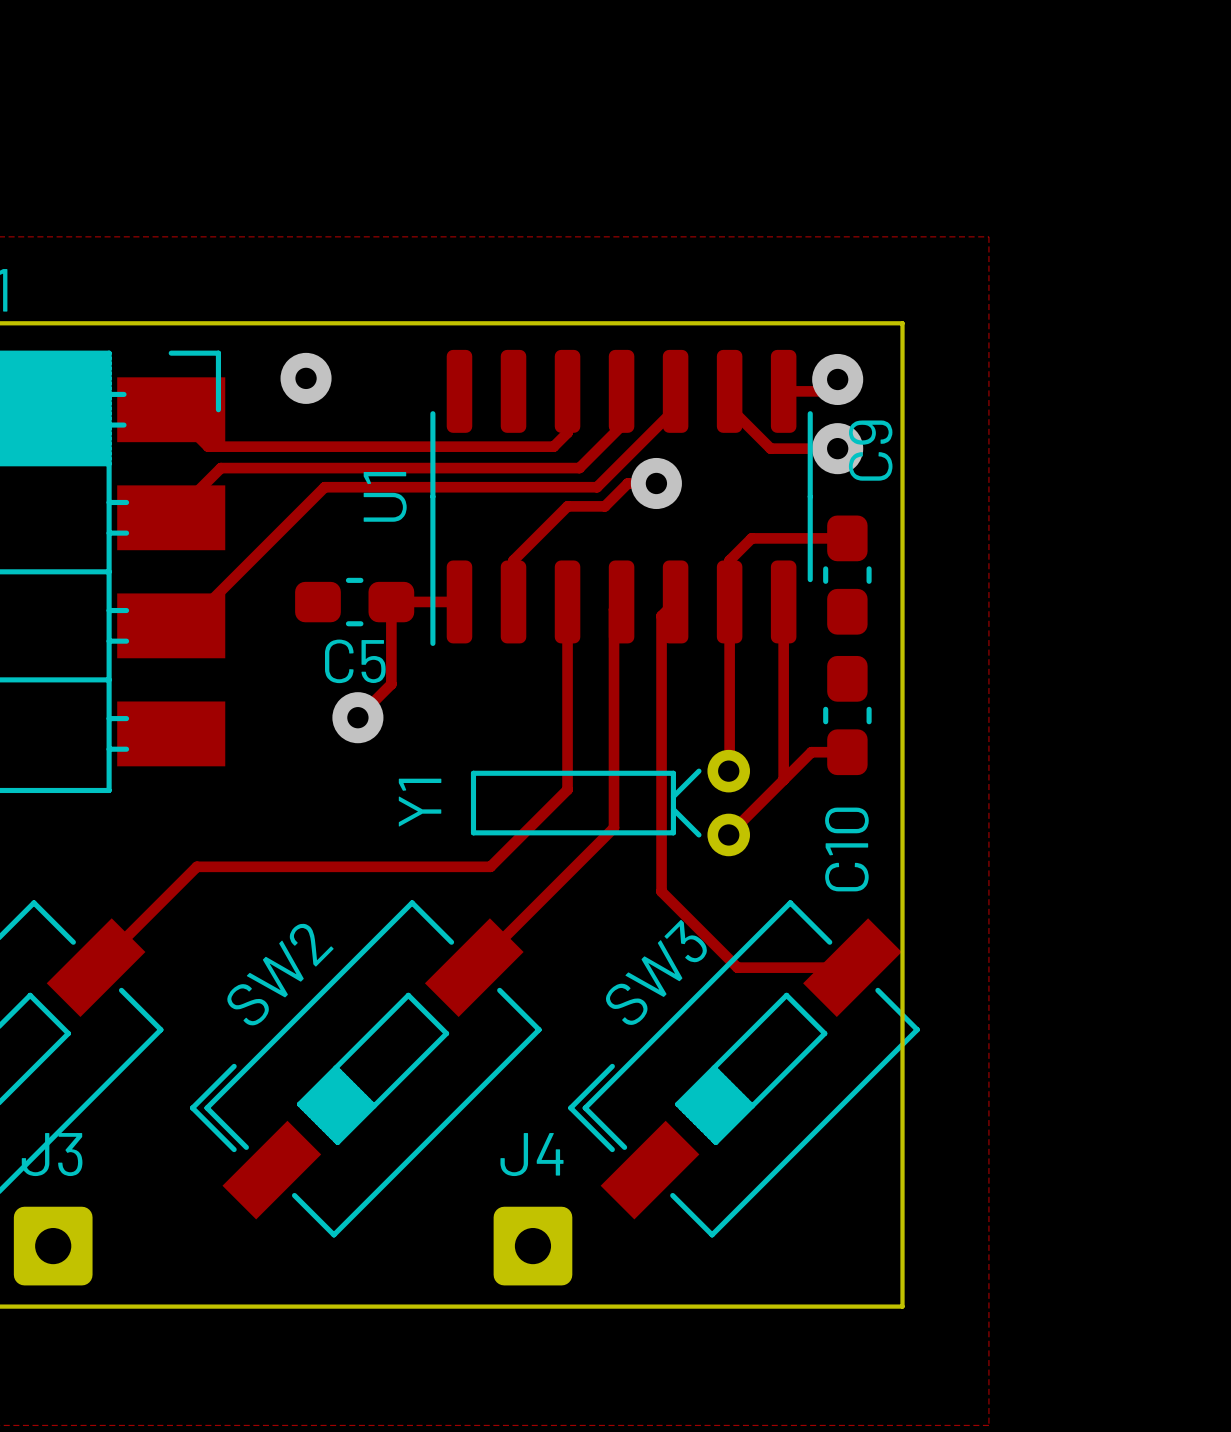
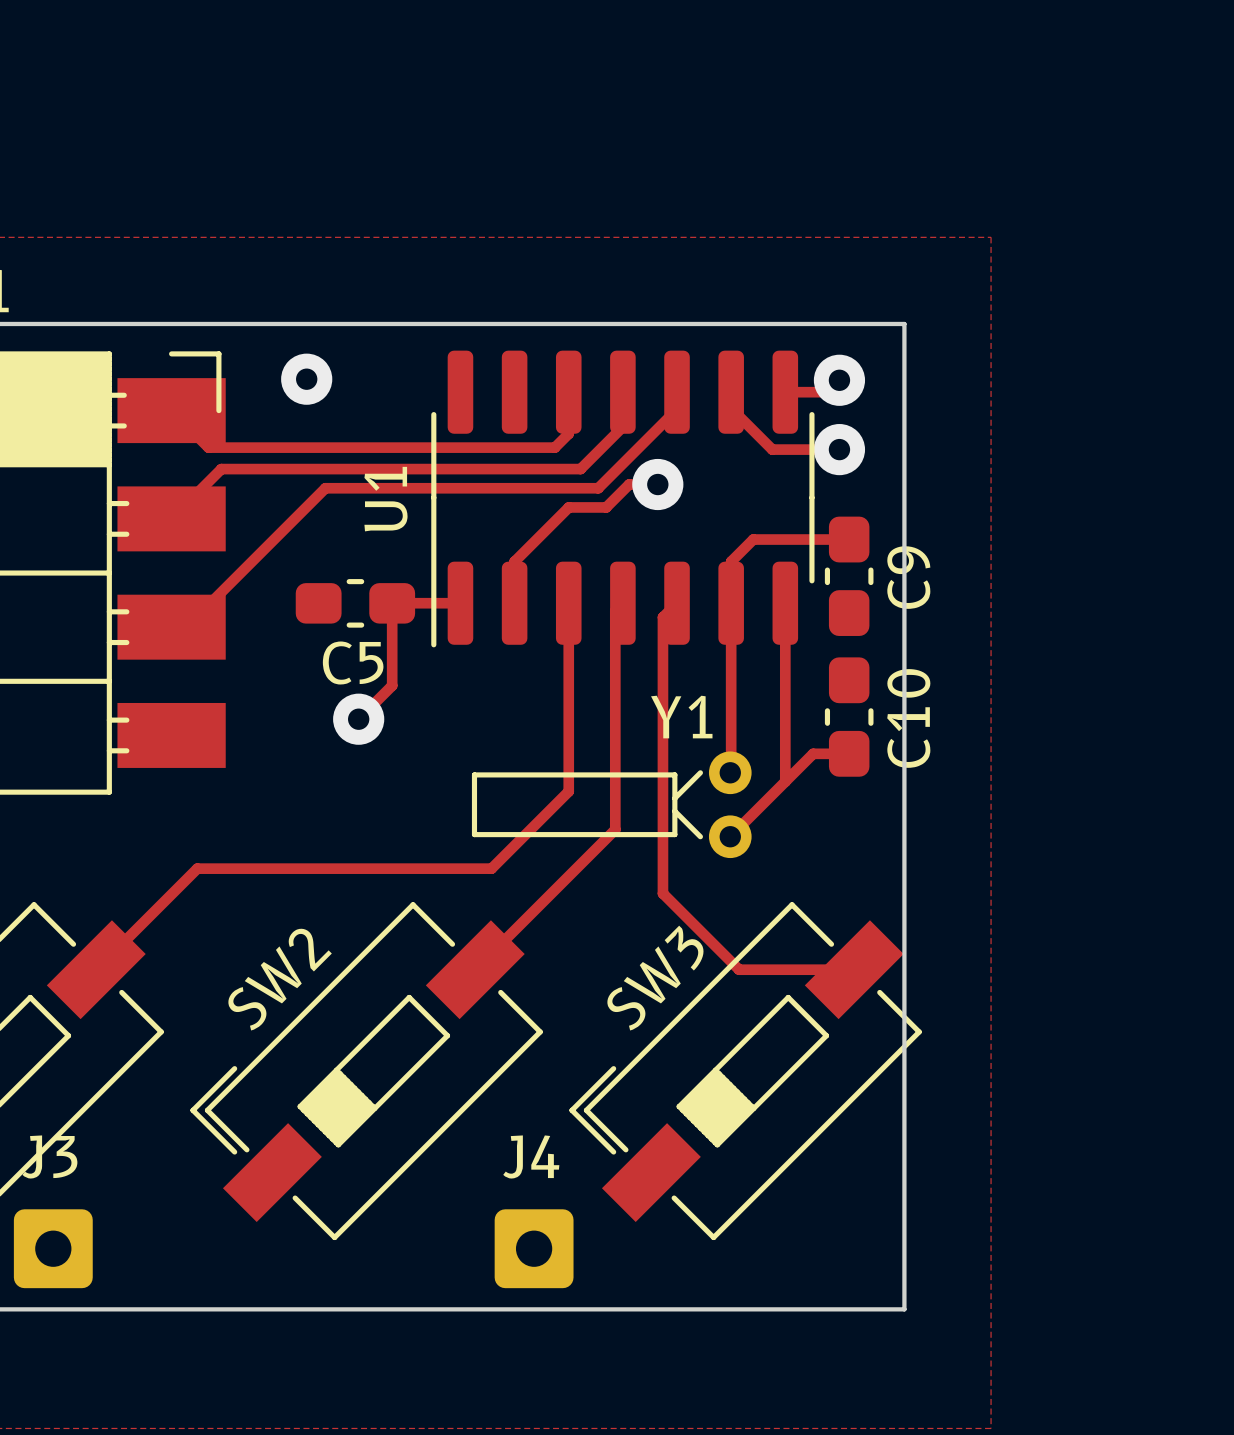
C9 name position: C9 (870, 450) -> C9 (908, 577)
Y1 name rotation: 0° (420, 802) -> 90° clockwise (681, 717)
Y1 name position: Y1 (420, 802) -> Y1 (681, 717)
C10 name position: C10 (846, 849) -> C10 (908, 718)

